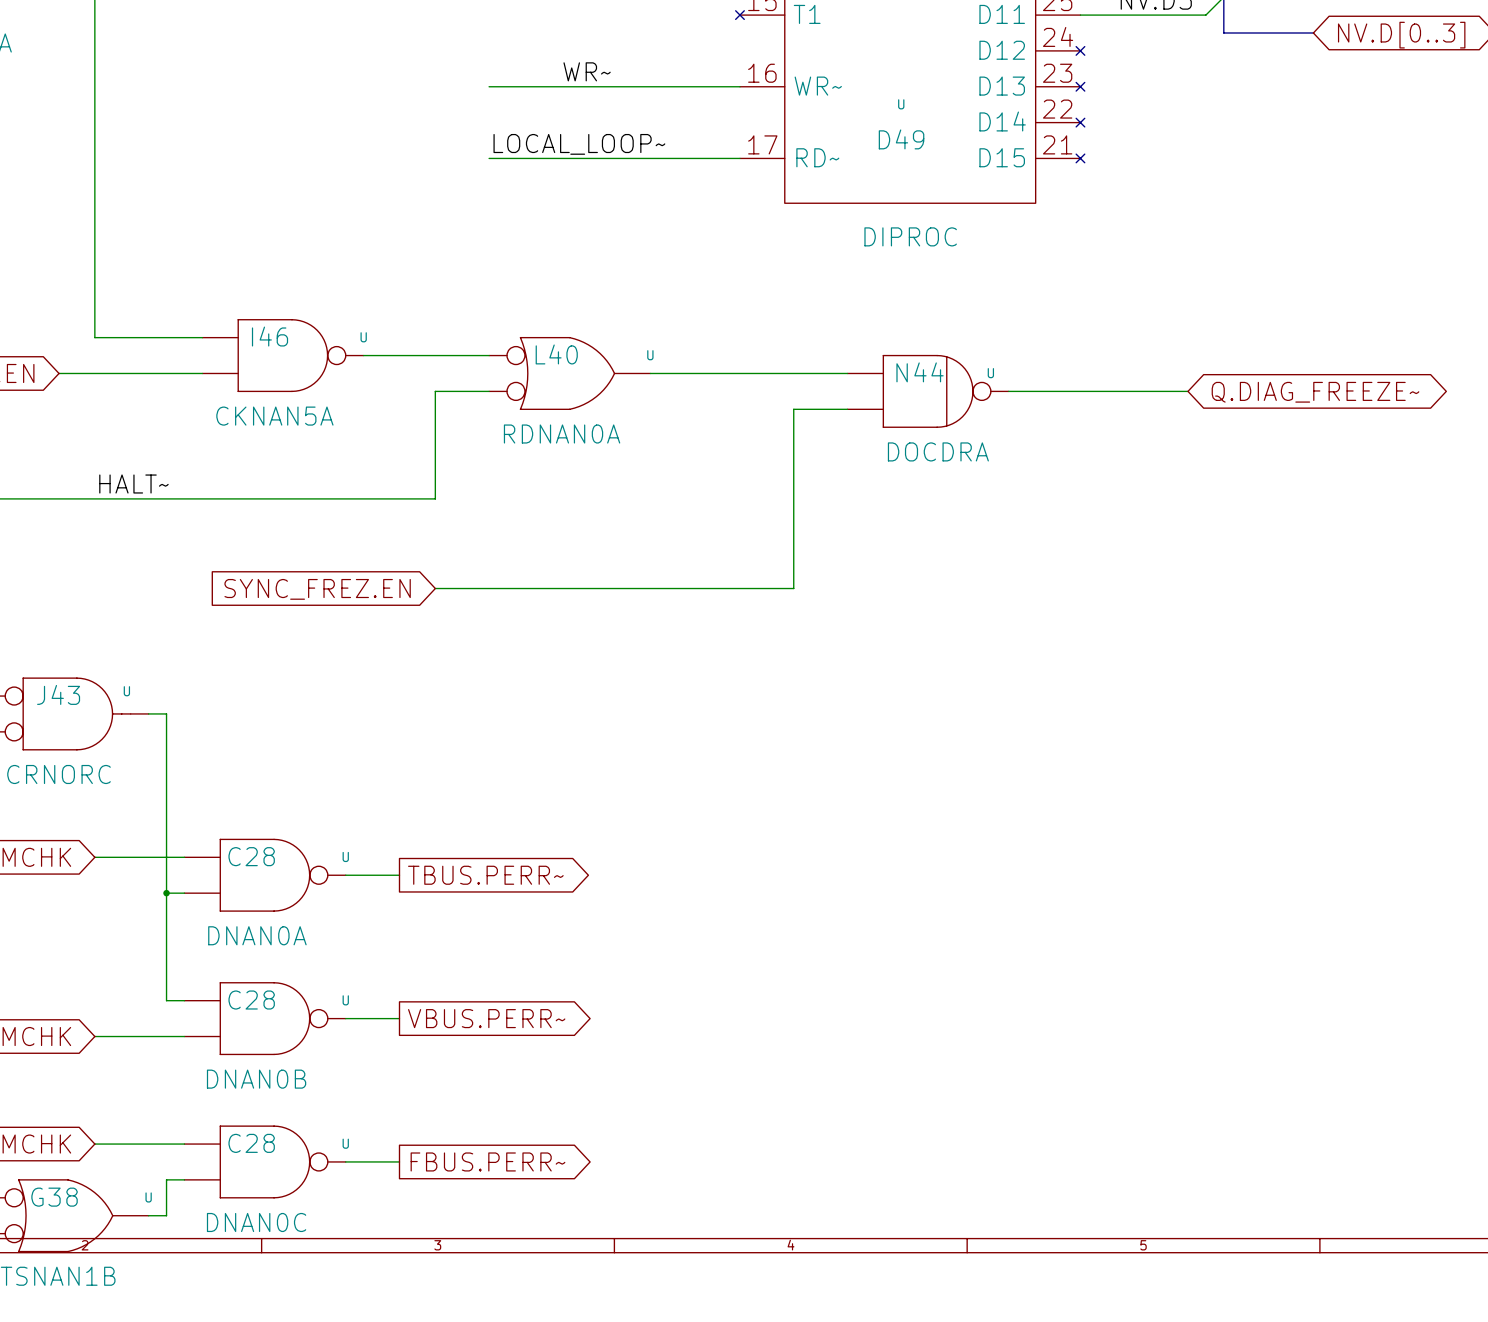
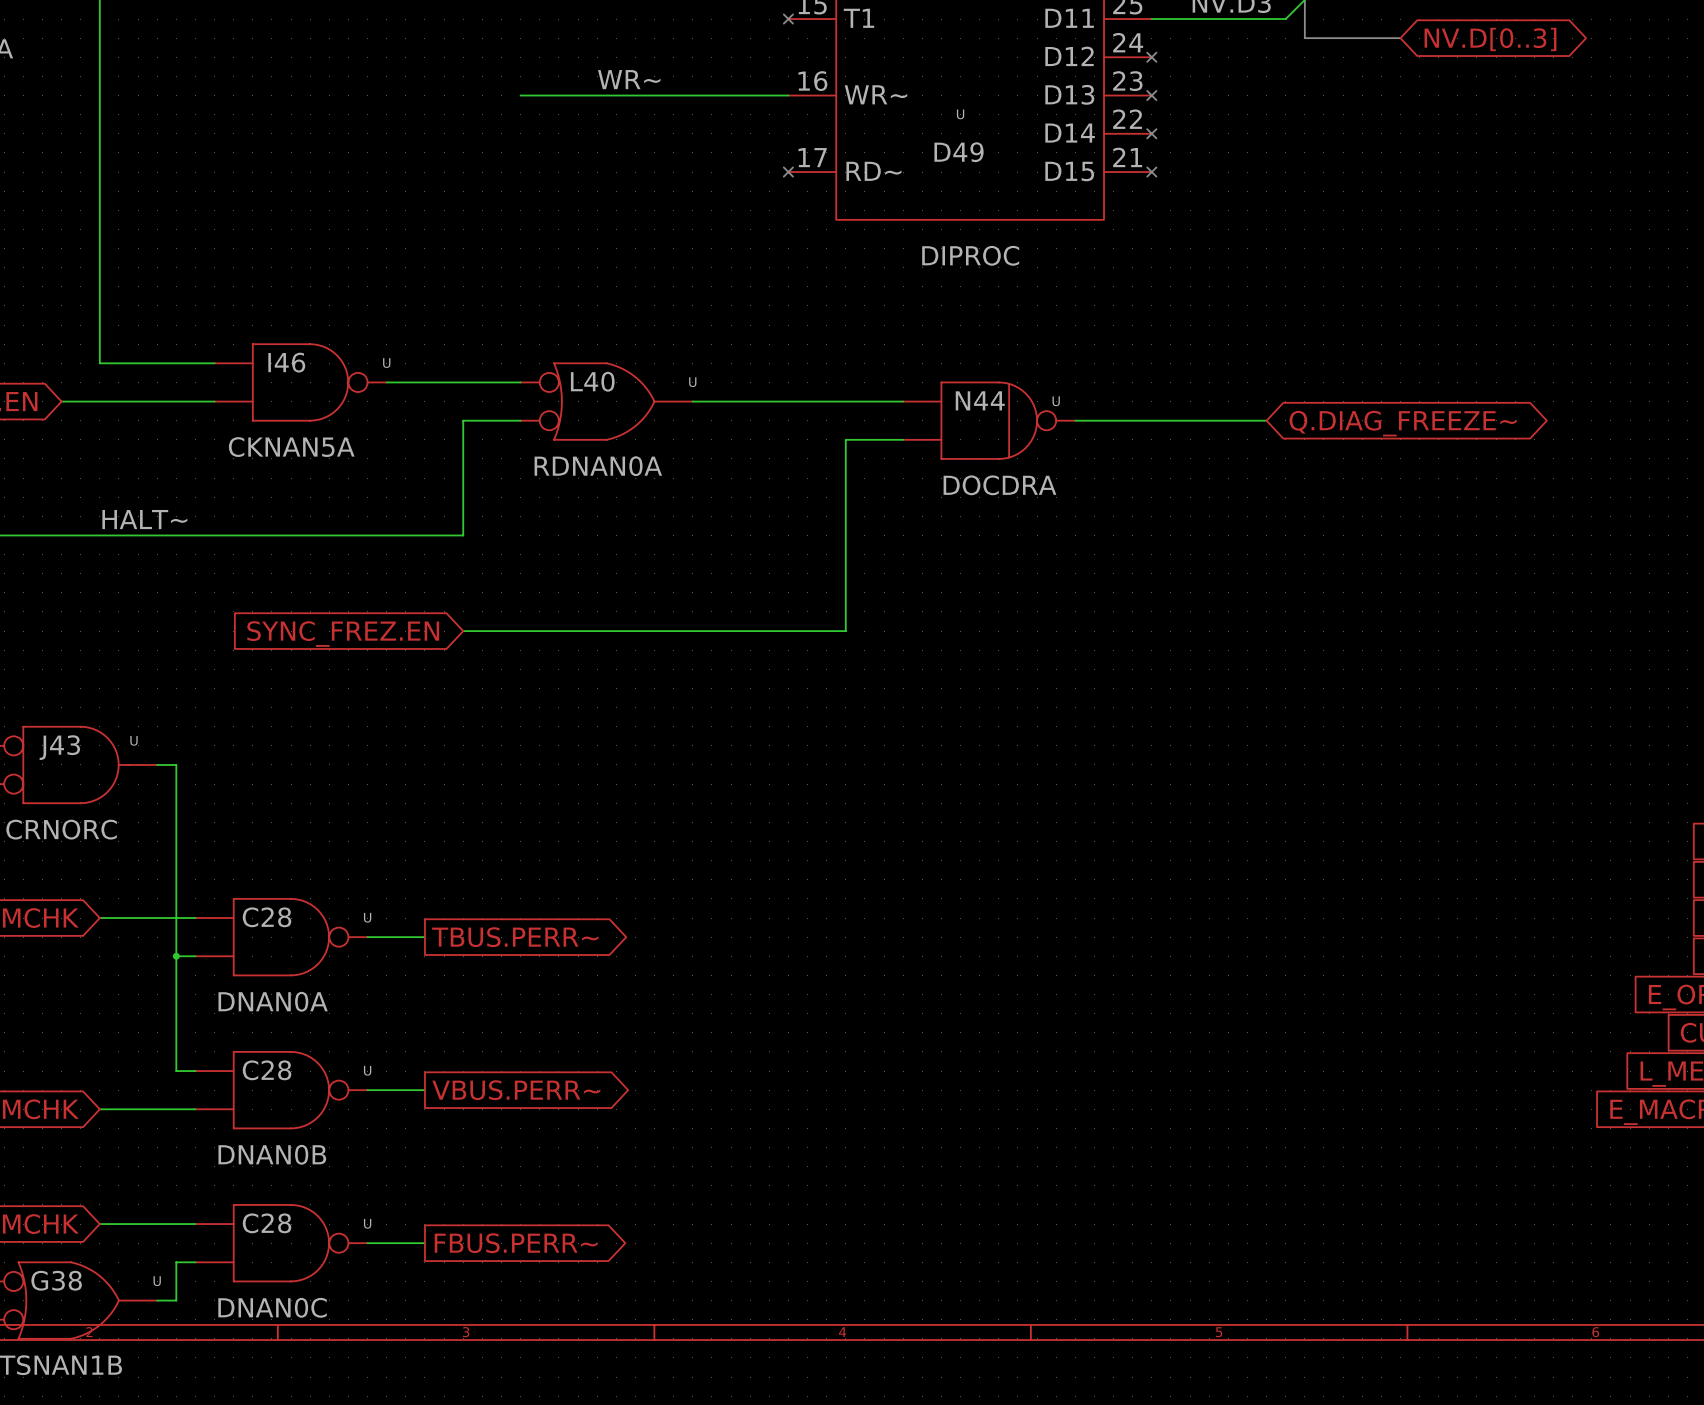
label: LOCAL_LOOP~ (579, 144) -> none
wire: (489, 158) (739, 158) -> none
no-connect mark: none -> (788, 172)

